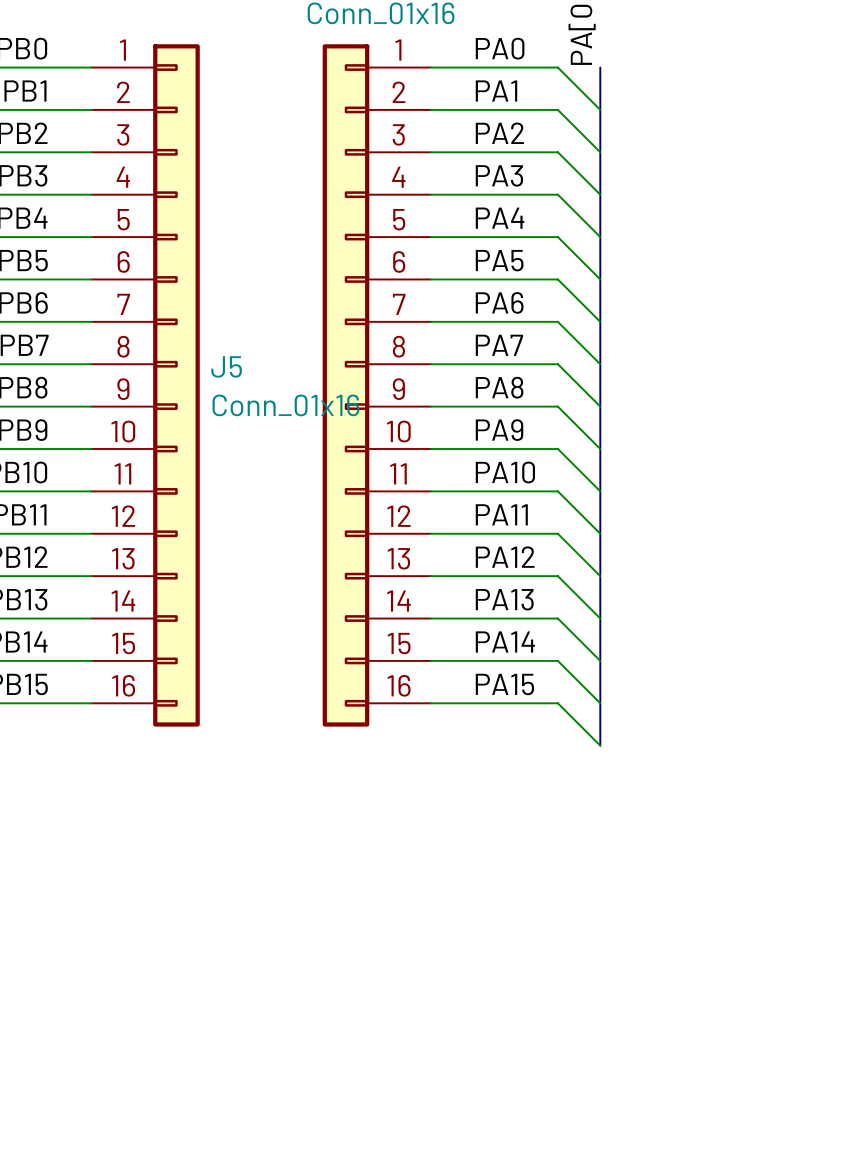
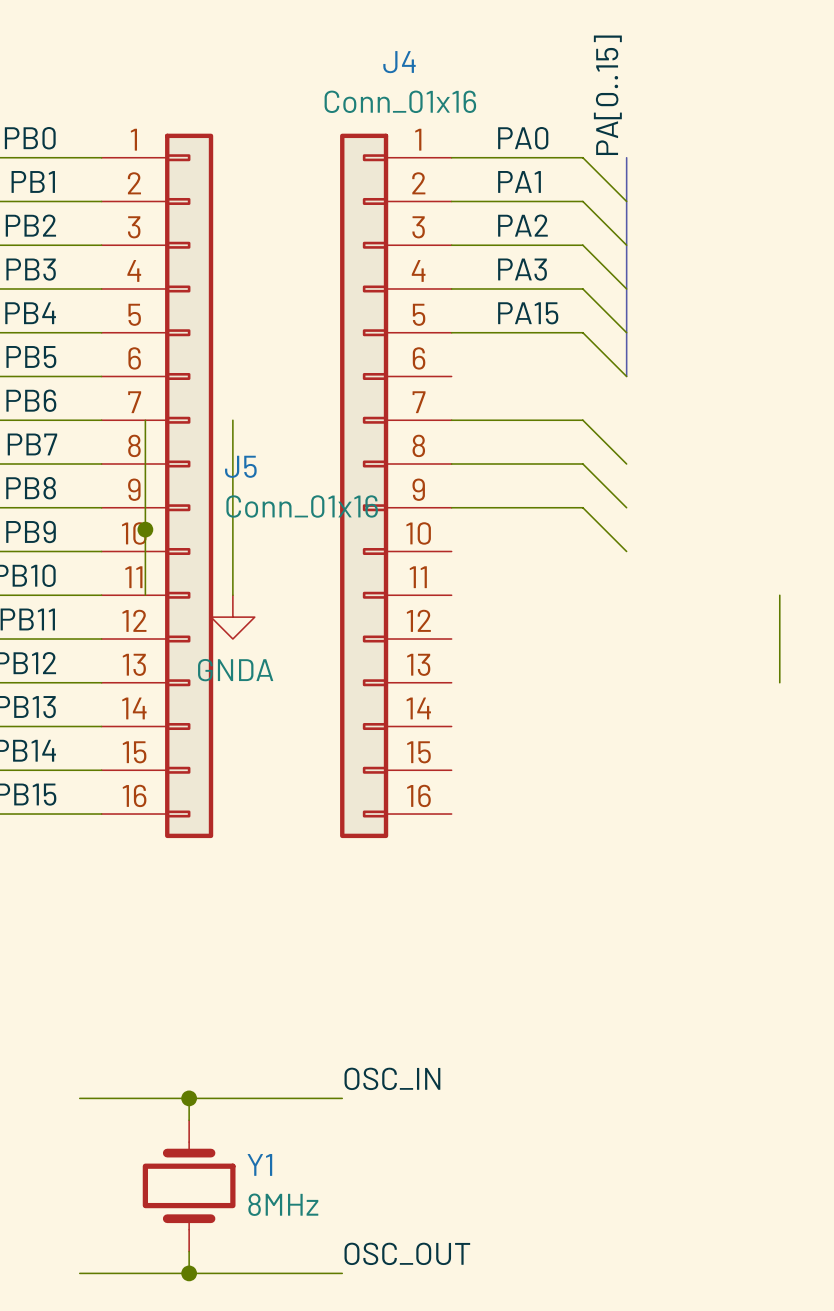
label: PA4 (500, 218) -> PA15 (528, 313)
label: PA5 (499, 260) -> none
wire: (430, 279) (557, 279) (600, 321) -> none
bus: (600, 279) (600, 745) -> none
label: PA6 (499, 302) -> none
wire: none -> (145, 420) (145, 595)
wire: none -> (232, 420) (232, 595)
label: PA7 (499, 345) -> none
label: PA8 (499, 387) -> none
junction: none -> (145, 529)
label: PA9 (499, 430) -> none
wire: (430, 449) (557, 449) (600, 491) -> none
label: PA10 (505, 472) -> none
wire: (430, 491) (557, 491) (600, 533) -> none
wire: none -> (779, 595) (779, 682)
power symbol: none -> GNDA (232, 617)
label: PA11 (501, 514) -> none
wire: (430, 533) (557, 533) (600, 576) -> none
label: PA12 (505, 557) -> none
wire: (430, 576) (557, 576) (600, 618) -> none
label: PA13 (504, 599) -> none
wire: (430, 618) (557, 618) (600, 660) -> none
label: PA14 (505, 641) -> none
wire: (430, 660) (557, 660) (600, 703) -> none
label: PA15 (504, 684) -> none
wire: (430, 703) (557, 703) (600, 745) -> none
label: none -> OSC_IN (392, 1078)
wire: none -> (79, 1098) (342, 1098)
wire: none -> (189, 1098) (189, 1120)
junction: none -> (189, 1098)
Y1: none -> 8MHz (189, 1185)
wire: none -> (189, 1251) (189, 1273)
label: none -> OSC_OUT (407, 1253)
wire: none -> (79, 1273) (342, 1273)
junction: none -> (189, 1273)

